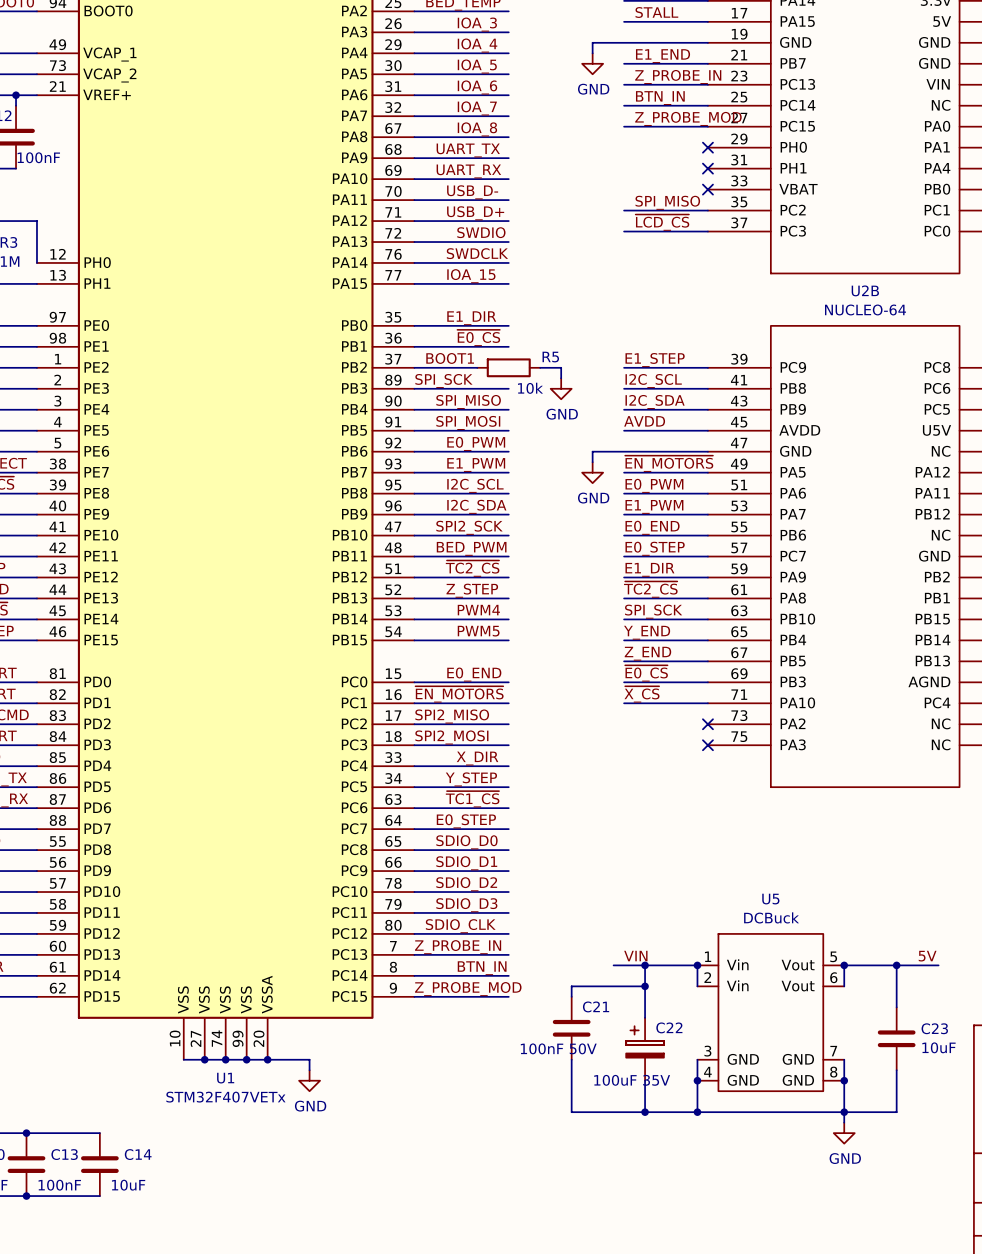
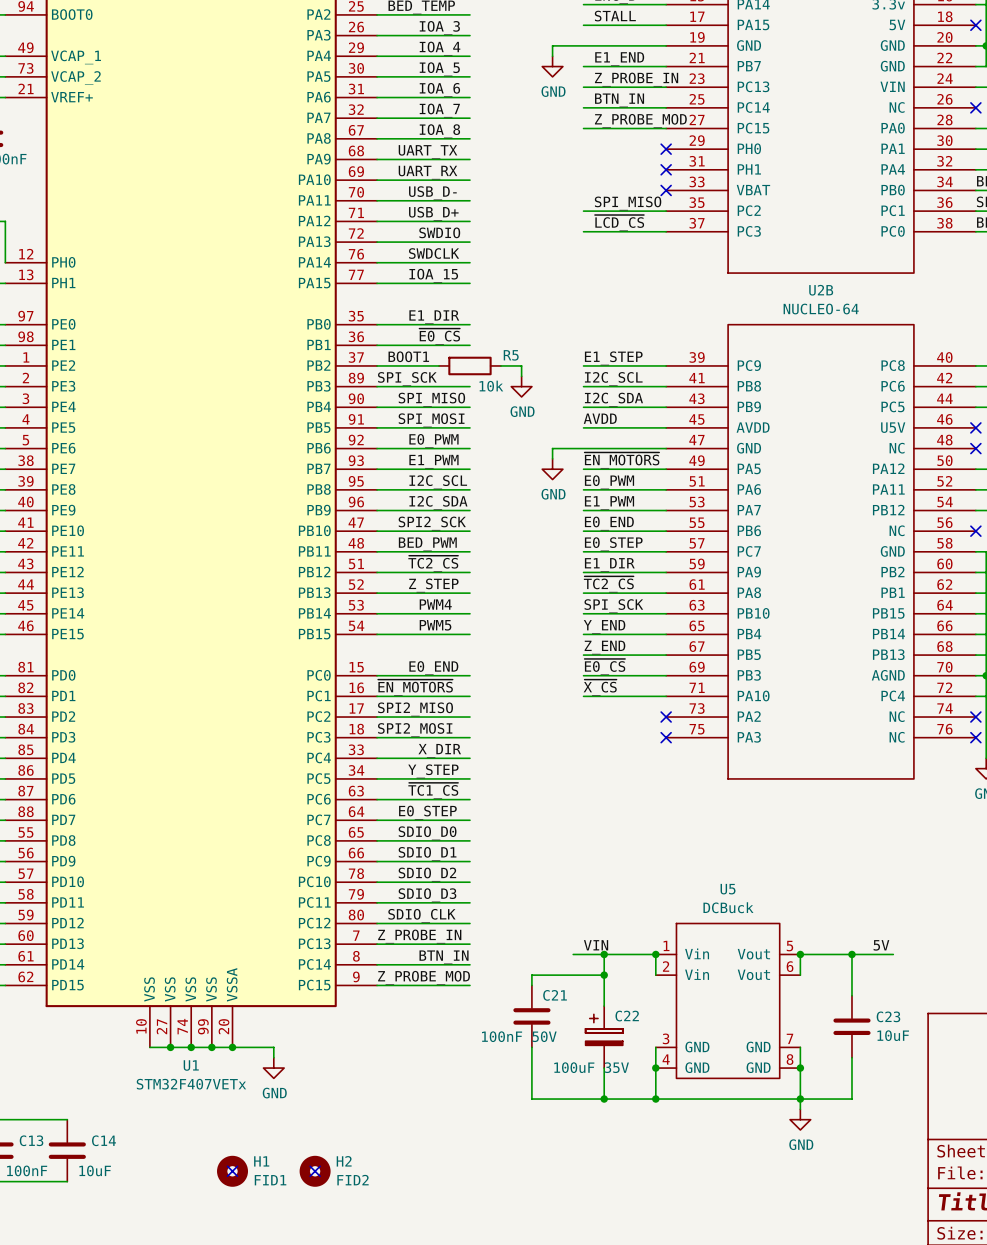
H1: none -> FID1 (232, 1171)
no-connect mark: none -> (232, 1171)
H2: none -> FID2 (315, 1171)
no-connect mark: none -> (315, 1171)

